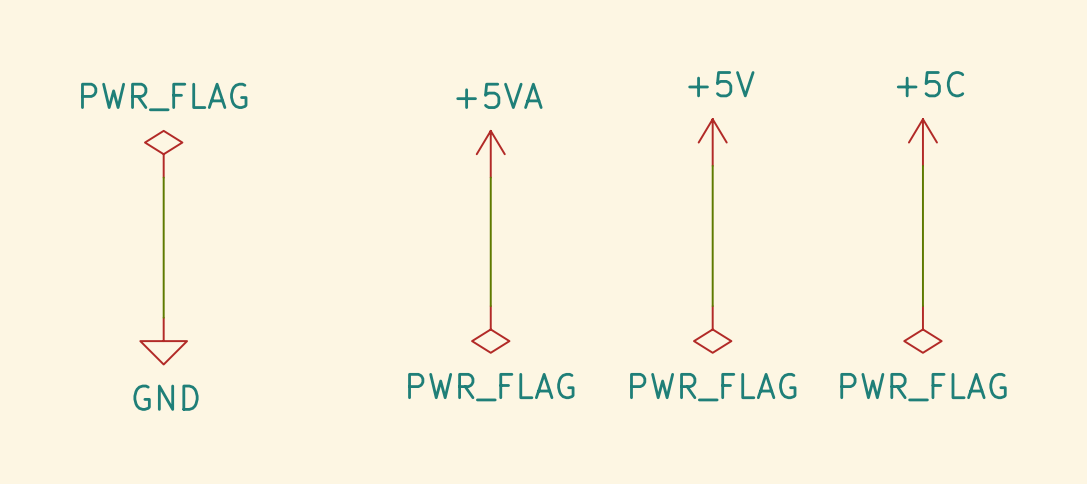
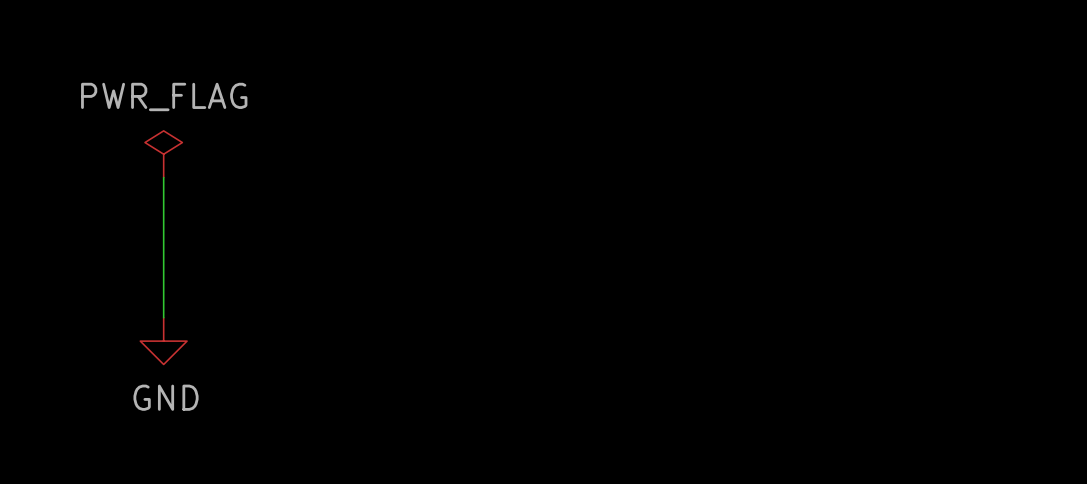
power symbol: +5V (712, 142) -> none
power symbol: +5C (922, 142) -> none
power symbol: +5VA (490, 154) -> none
wire: (712, 165) (712, 306) -> none
wire: (922, 165) (922, 306) -> none
wire: (490, 177) (490, 306) -> none
power symbol: PWR_FLAG (490, 329) -> none
power symbol: PWR_FLAG (712, 329) -> none
power symbol: PWR_FLAG (922, 329) -> none

